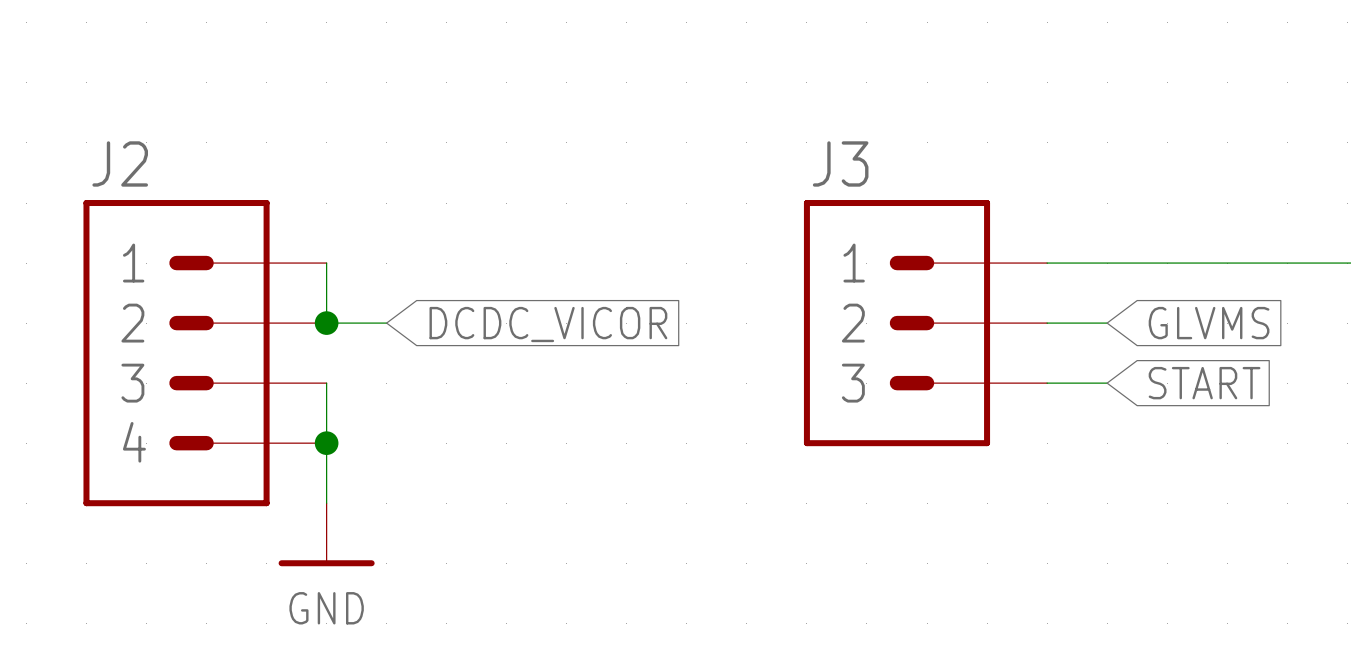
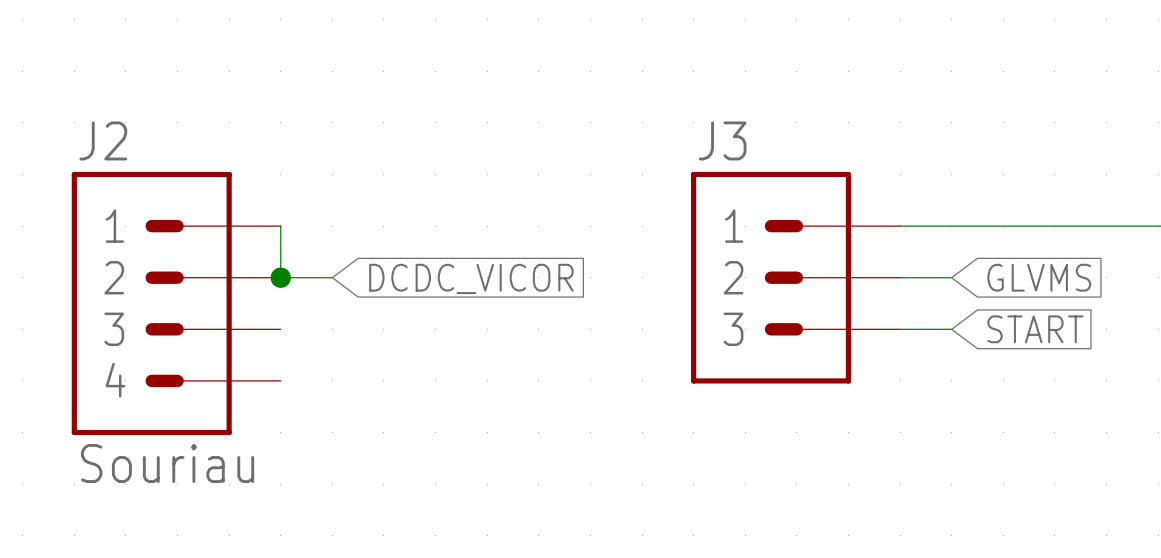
wire: (326, 383) (326, 503) -> none
junction: (326, 443) -> none
power symbol: GND (326, 534) -> none
J2 text: none -> Souriau (167, 463)

